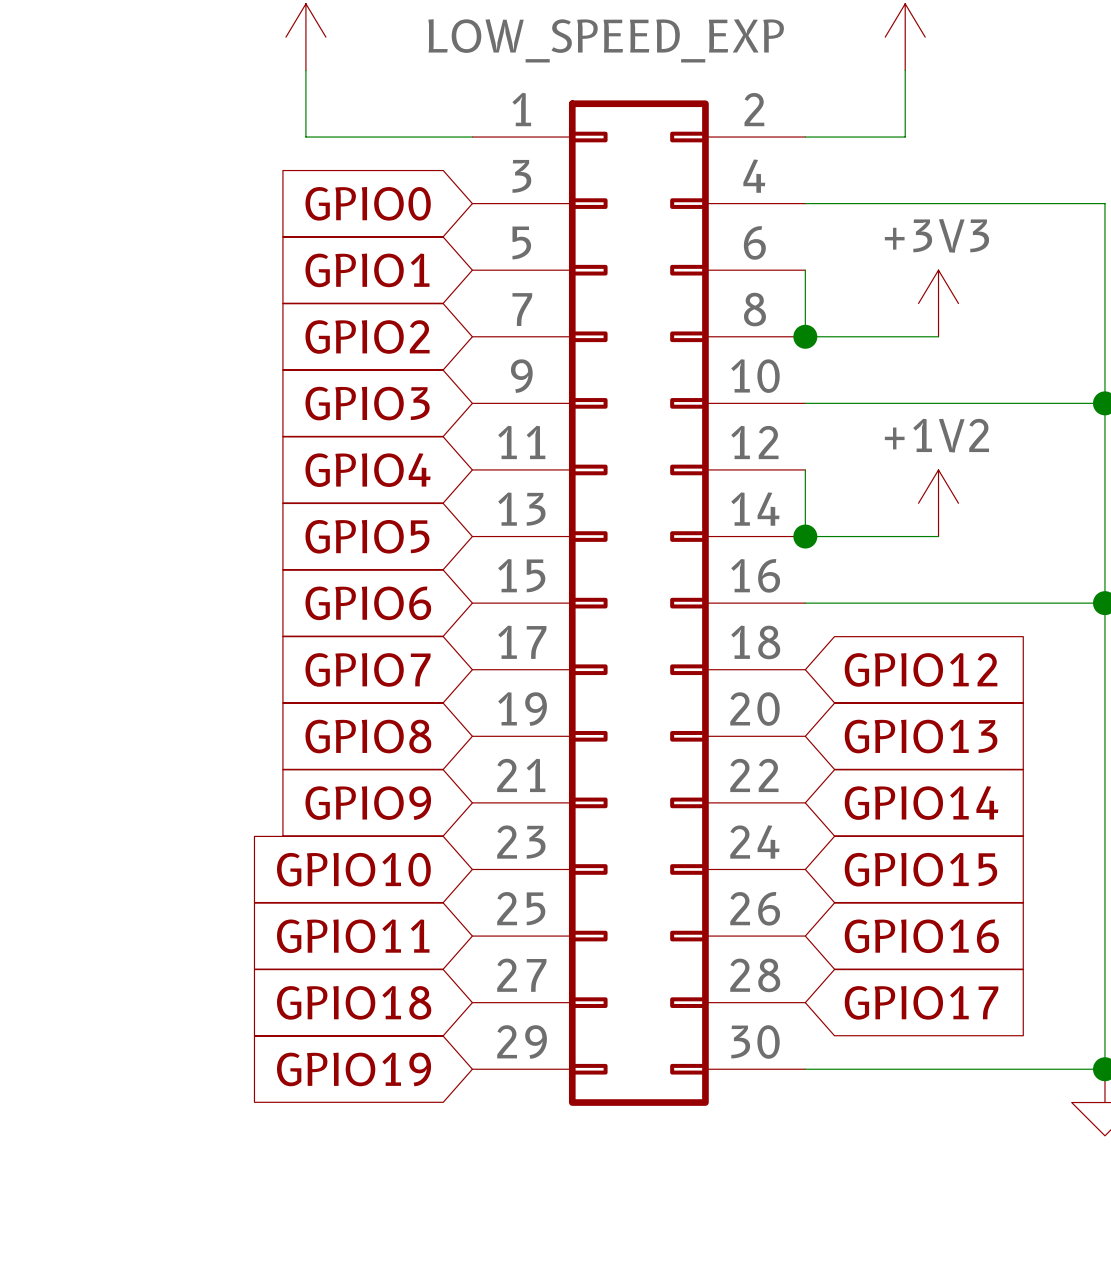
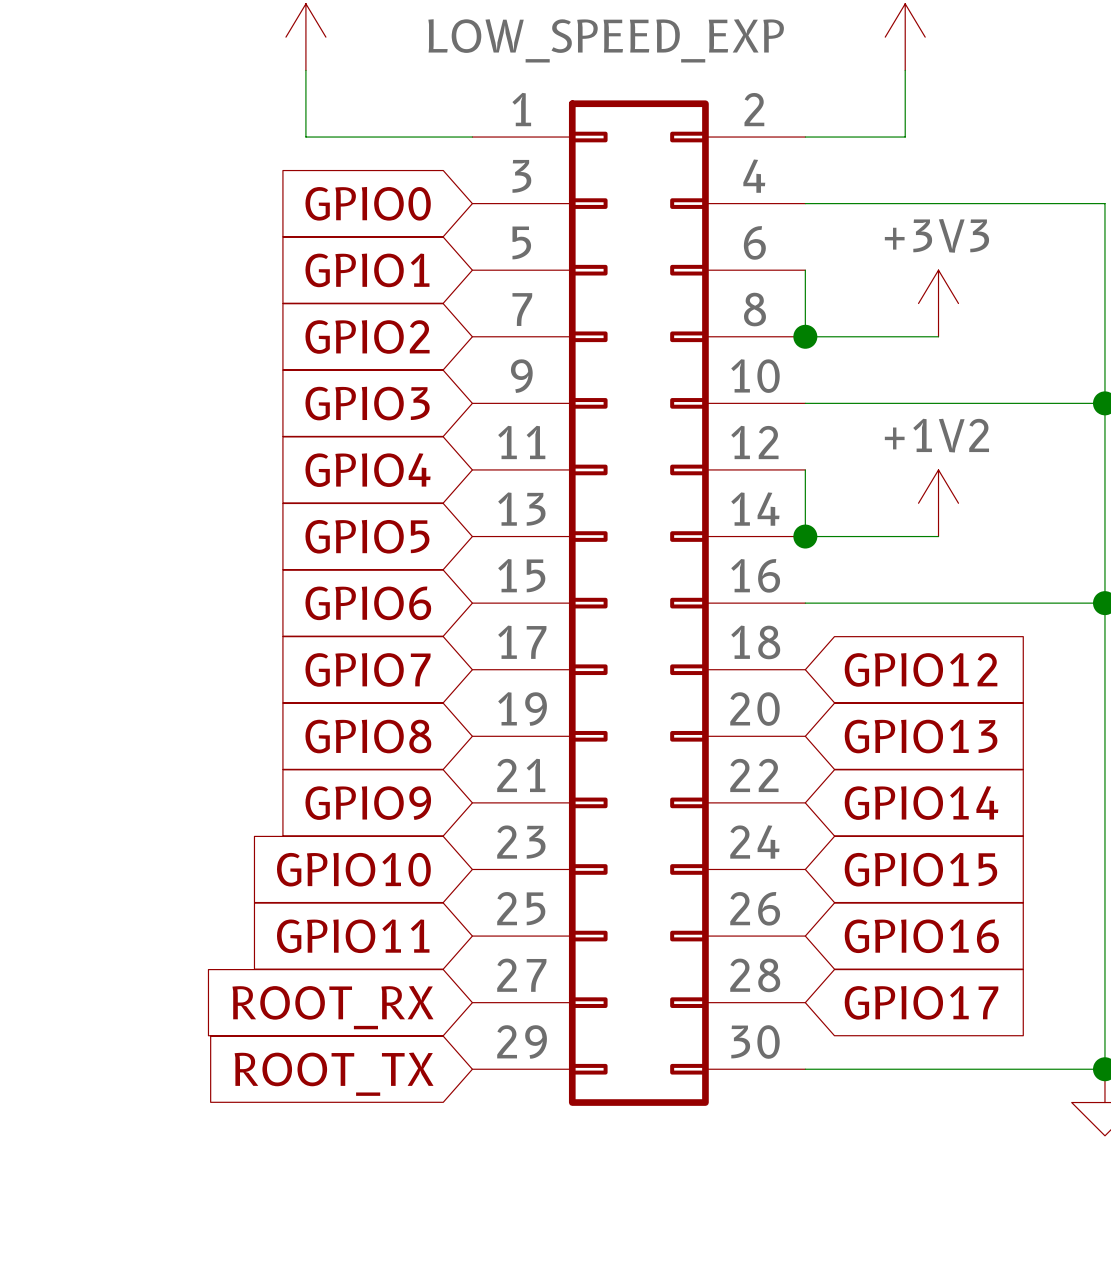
global label: GPIO18 (354, 1002) -> ROOT_RX (332, 1007)
global label: GPIO19 (354, 1069) -> ROOT_TX (334, 1074)

